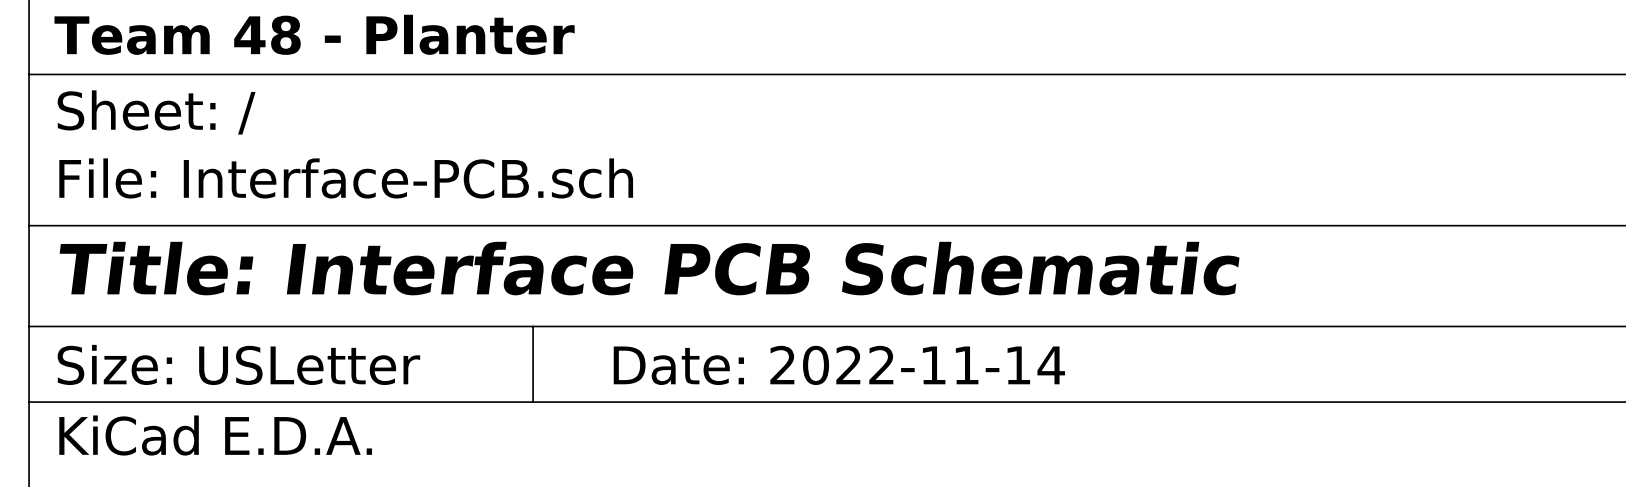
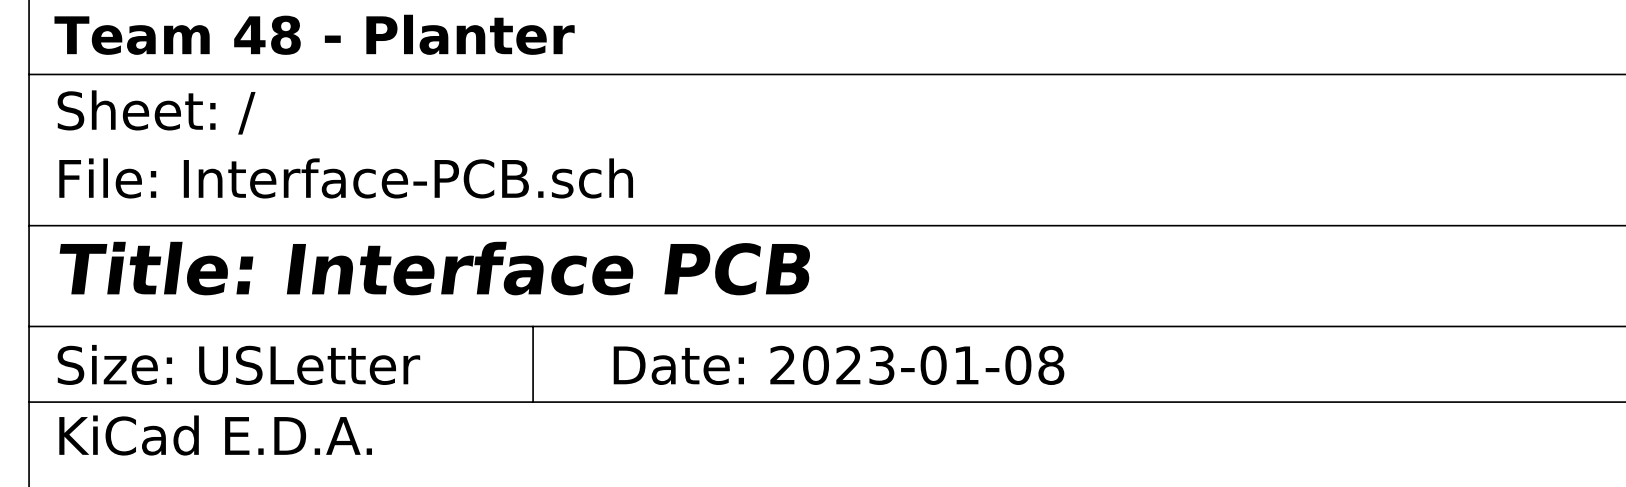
title block: Title: Interface PCB Schematic (649, 268) -> Title: Interface PCB (435, 268)
title block: Date: 2022-11-14 (839, 365) -> Date: 2023-01-08 (839, 365)

